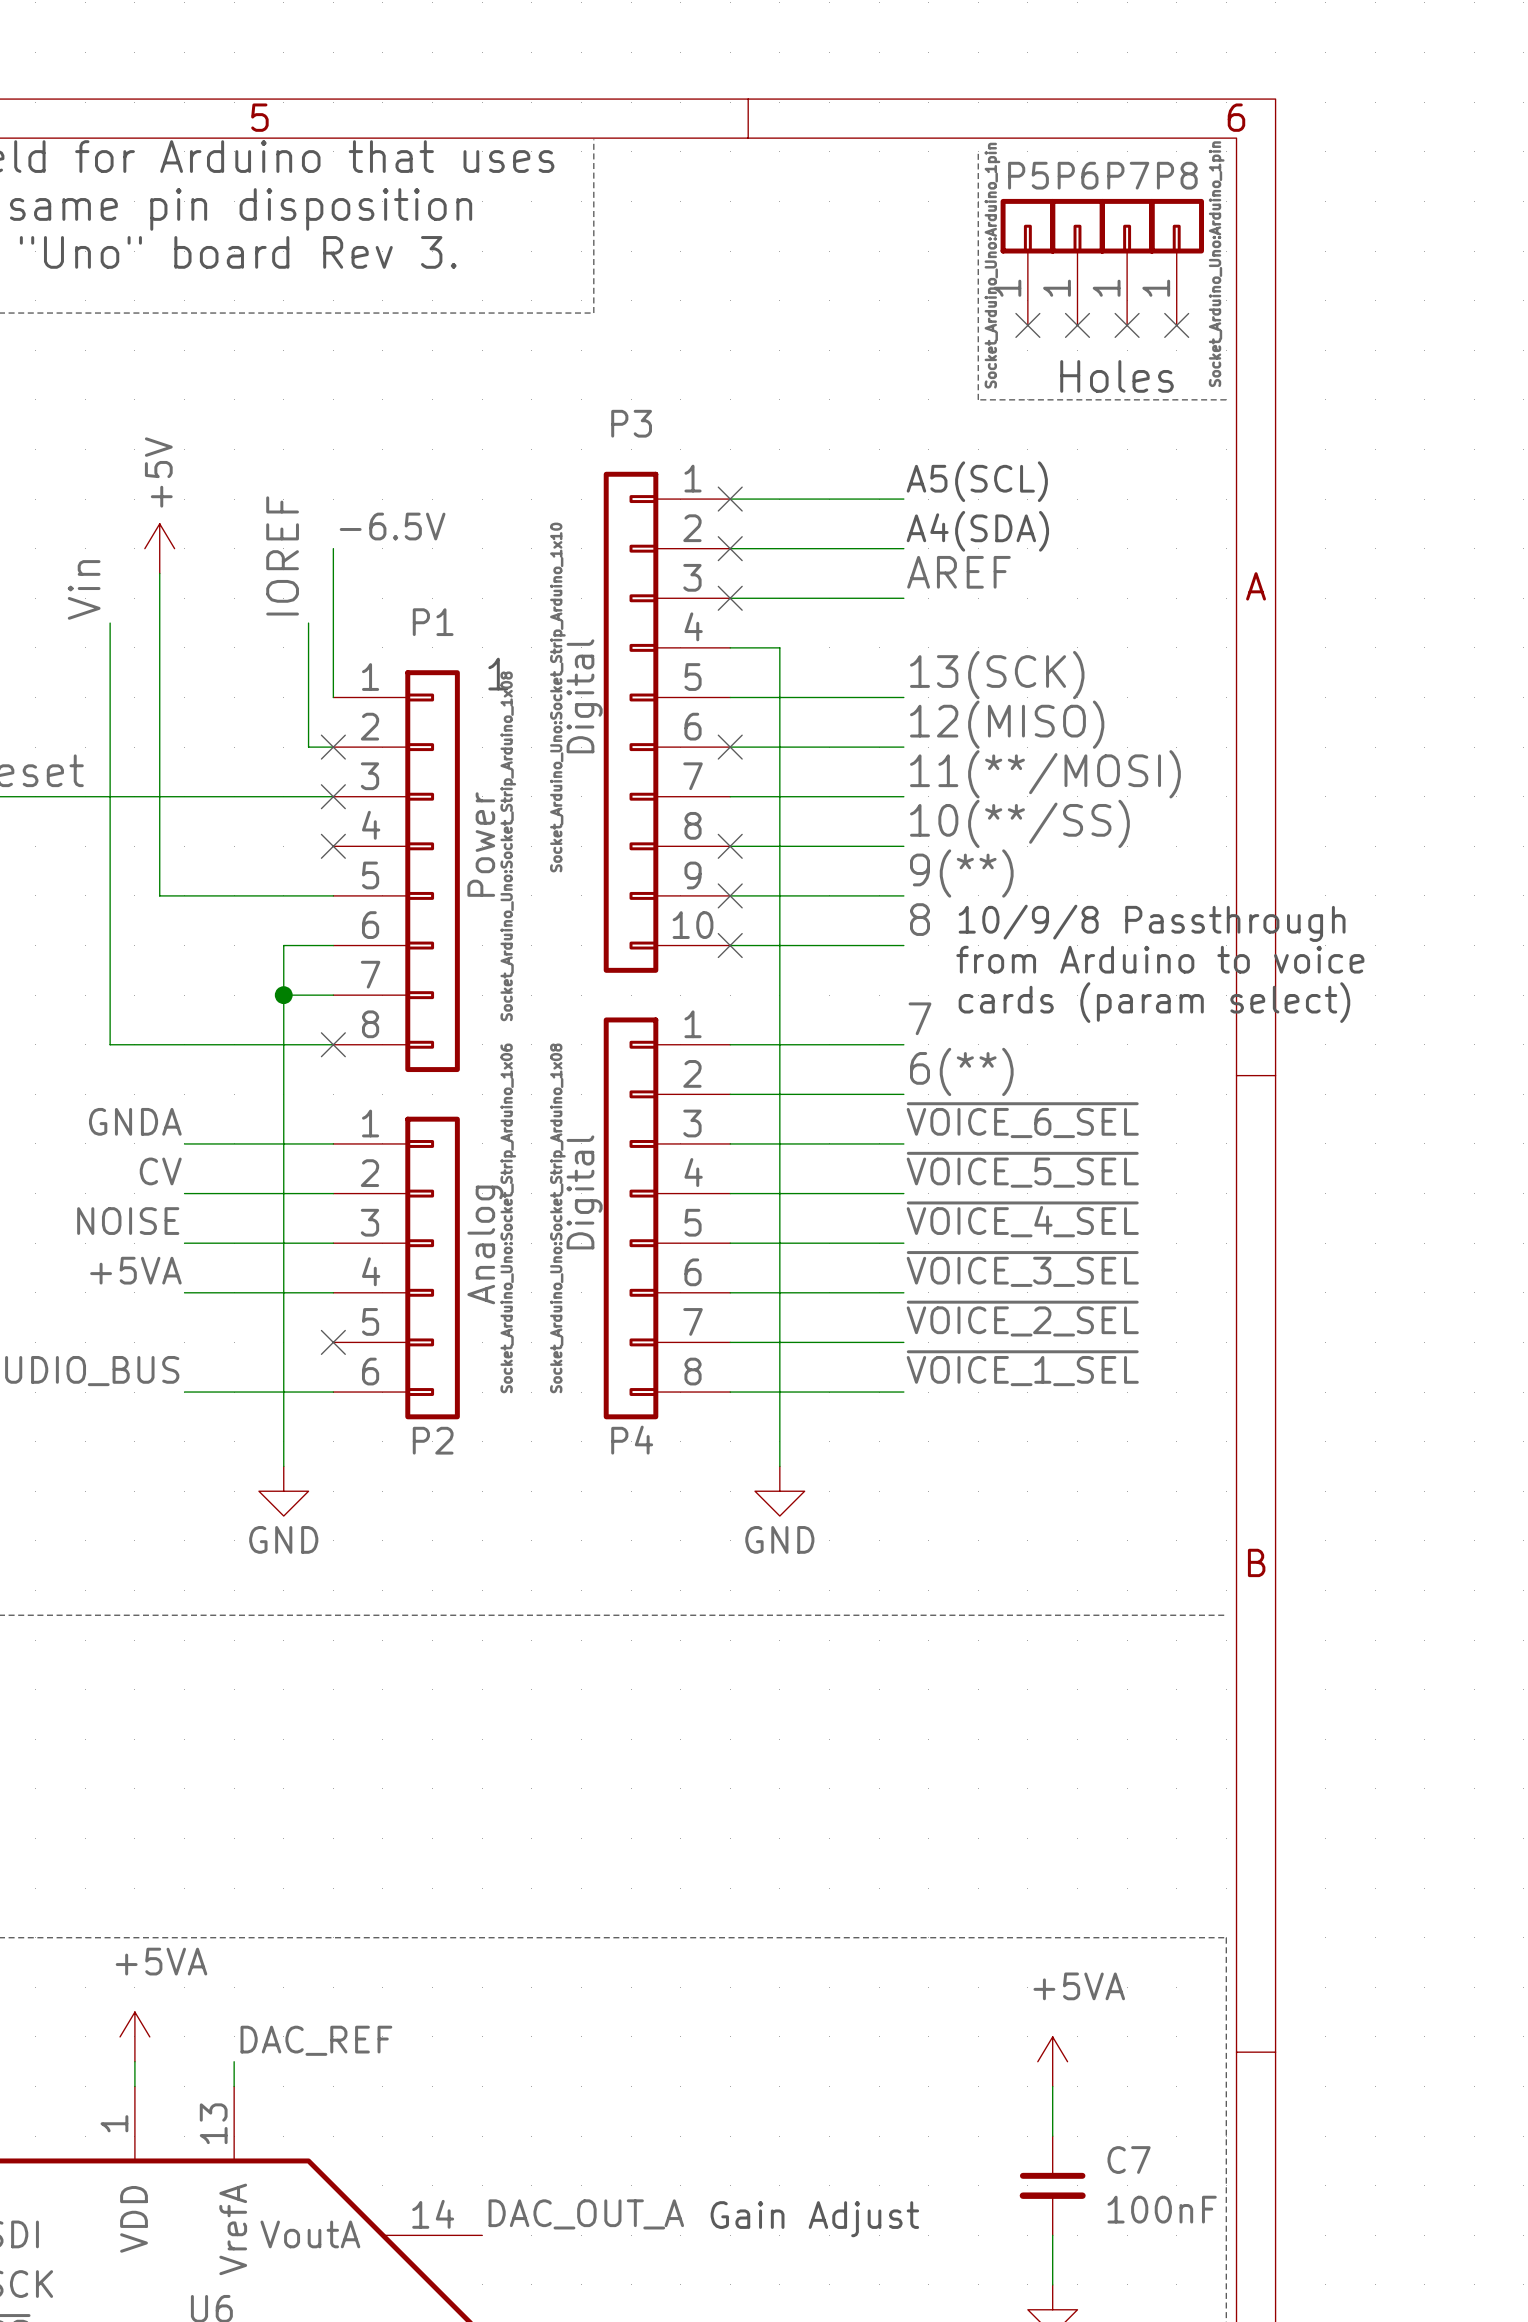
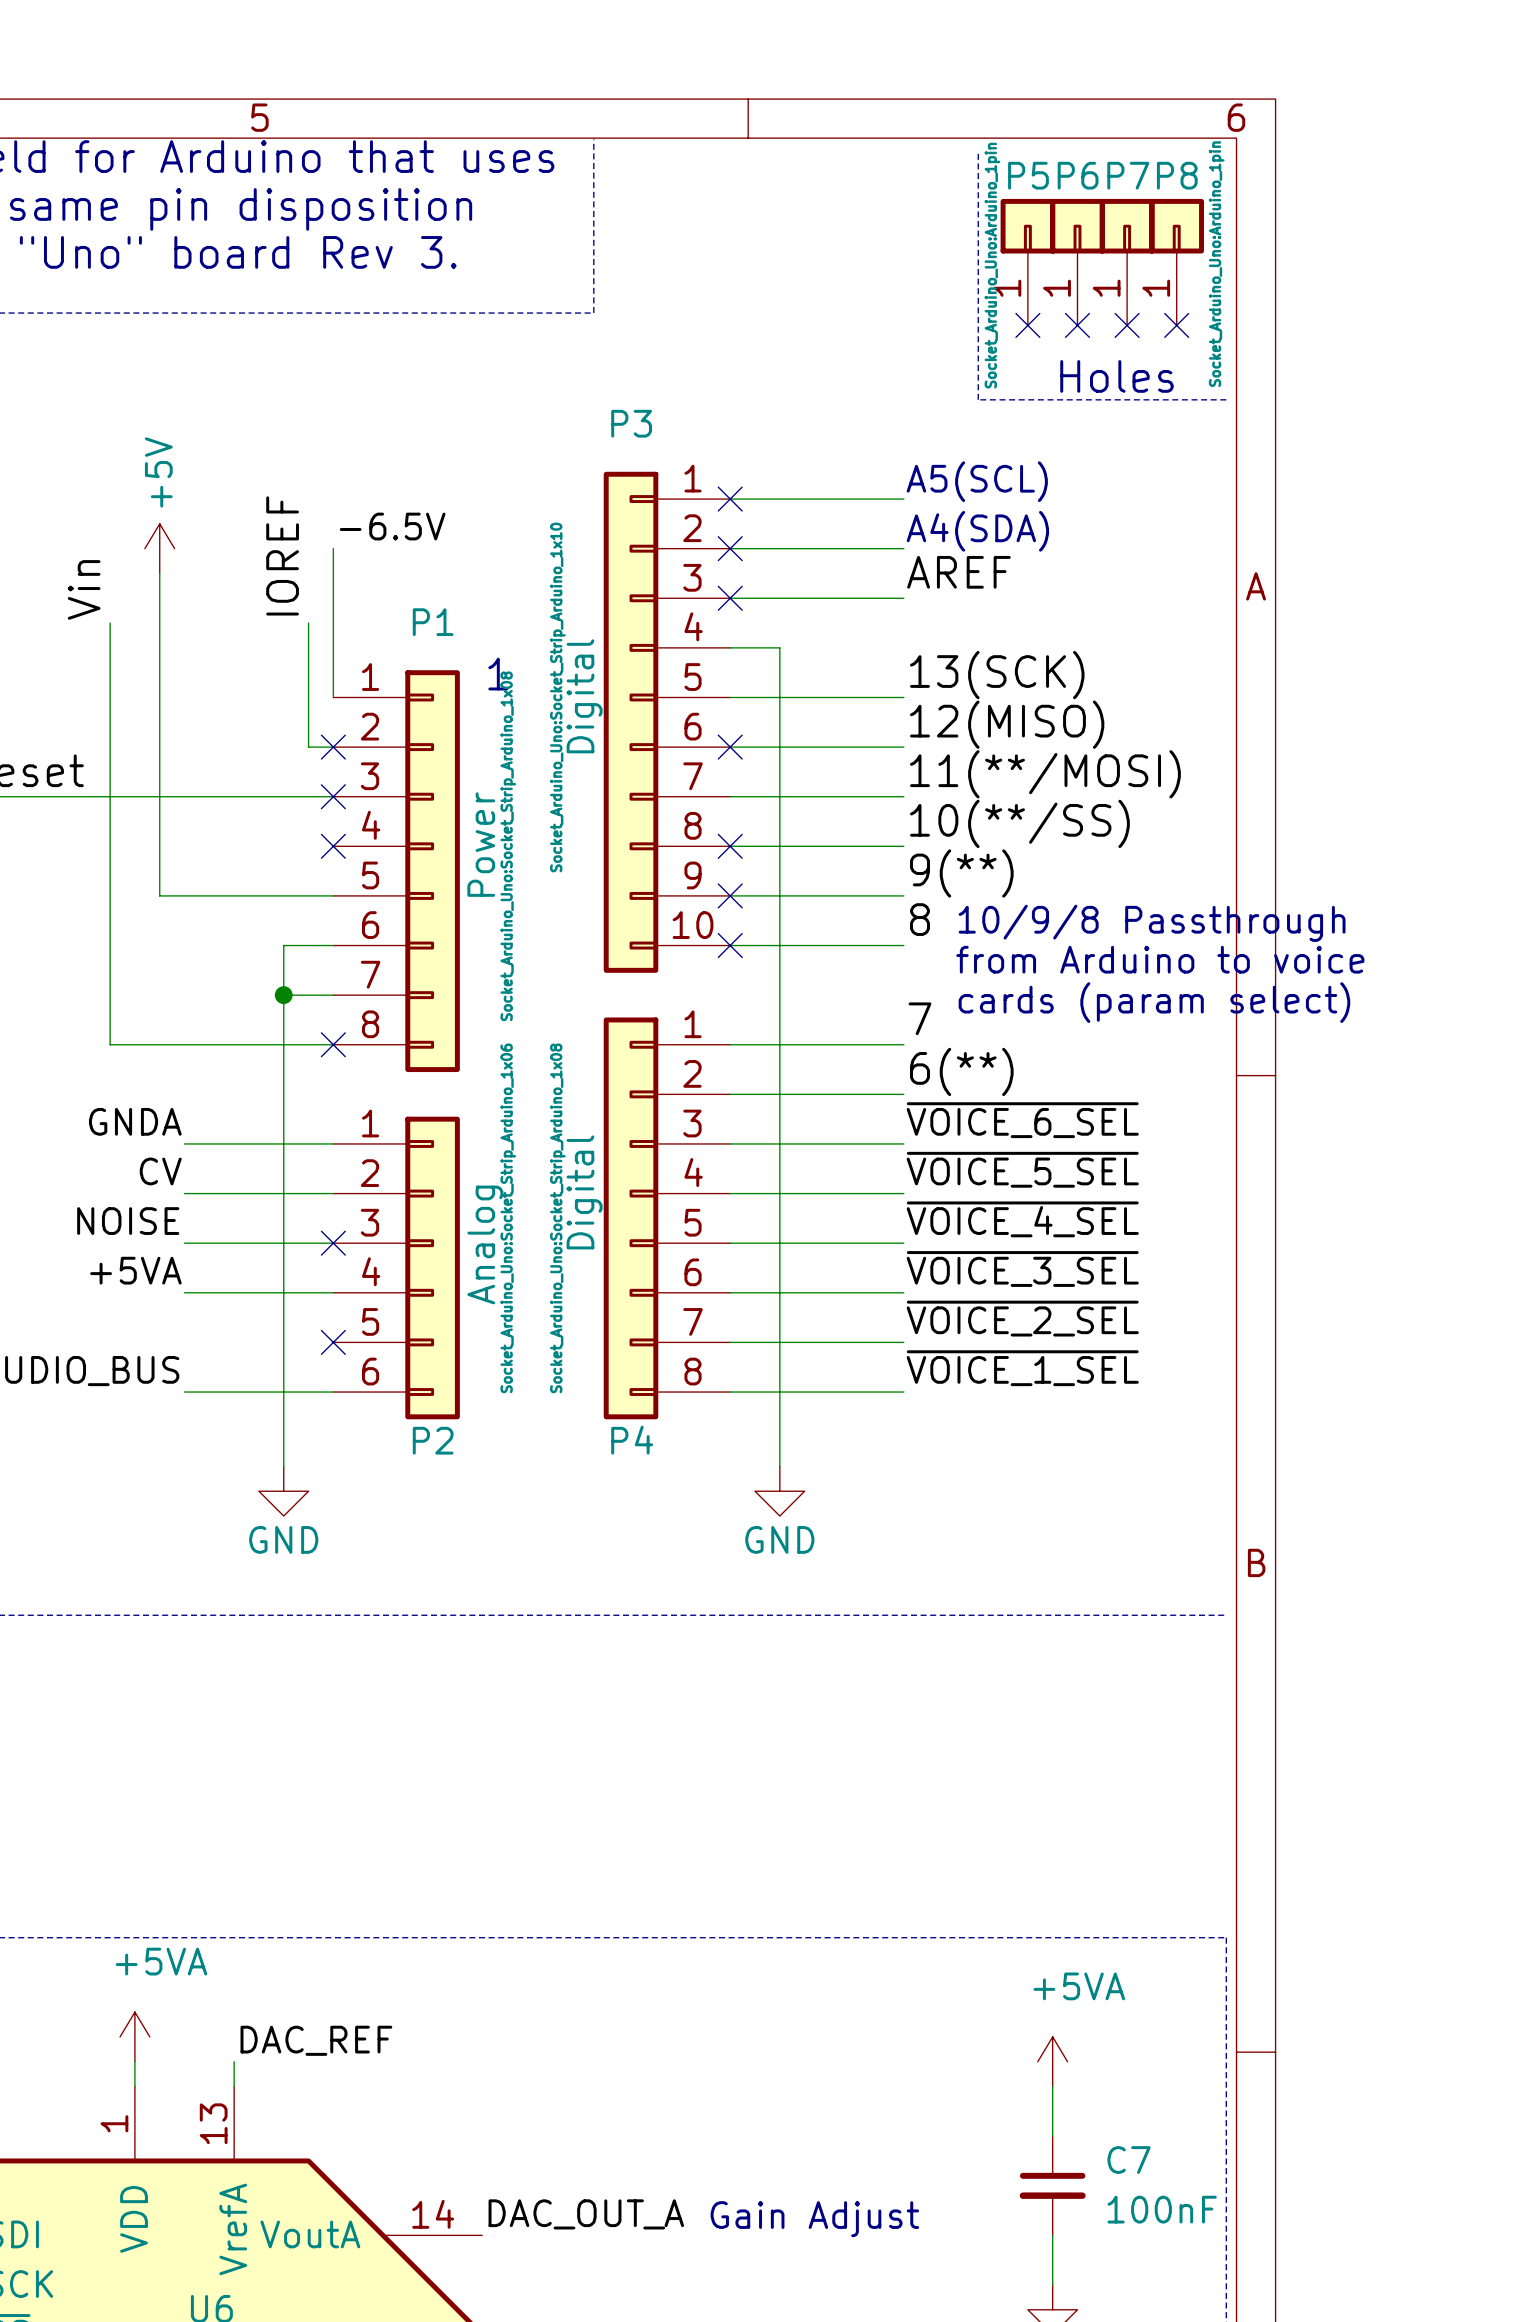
no-connect mark: none -> (333, 1243)

